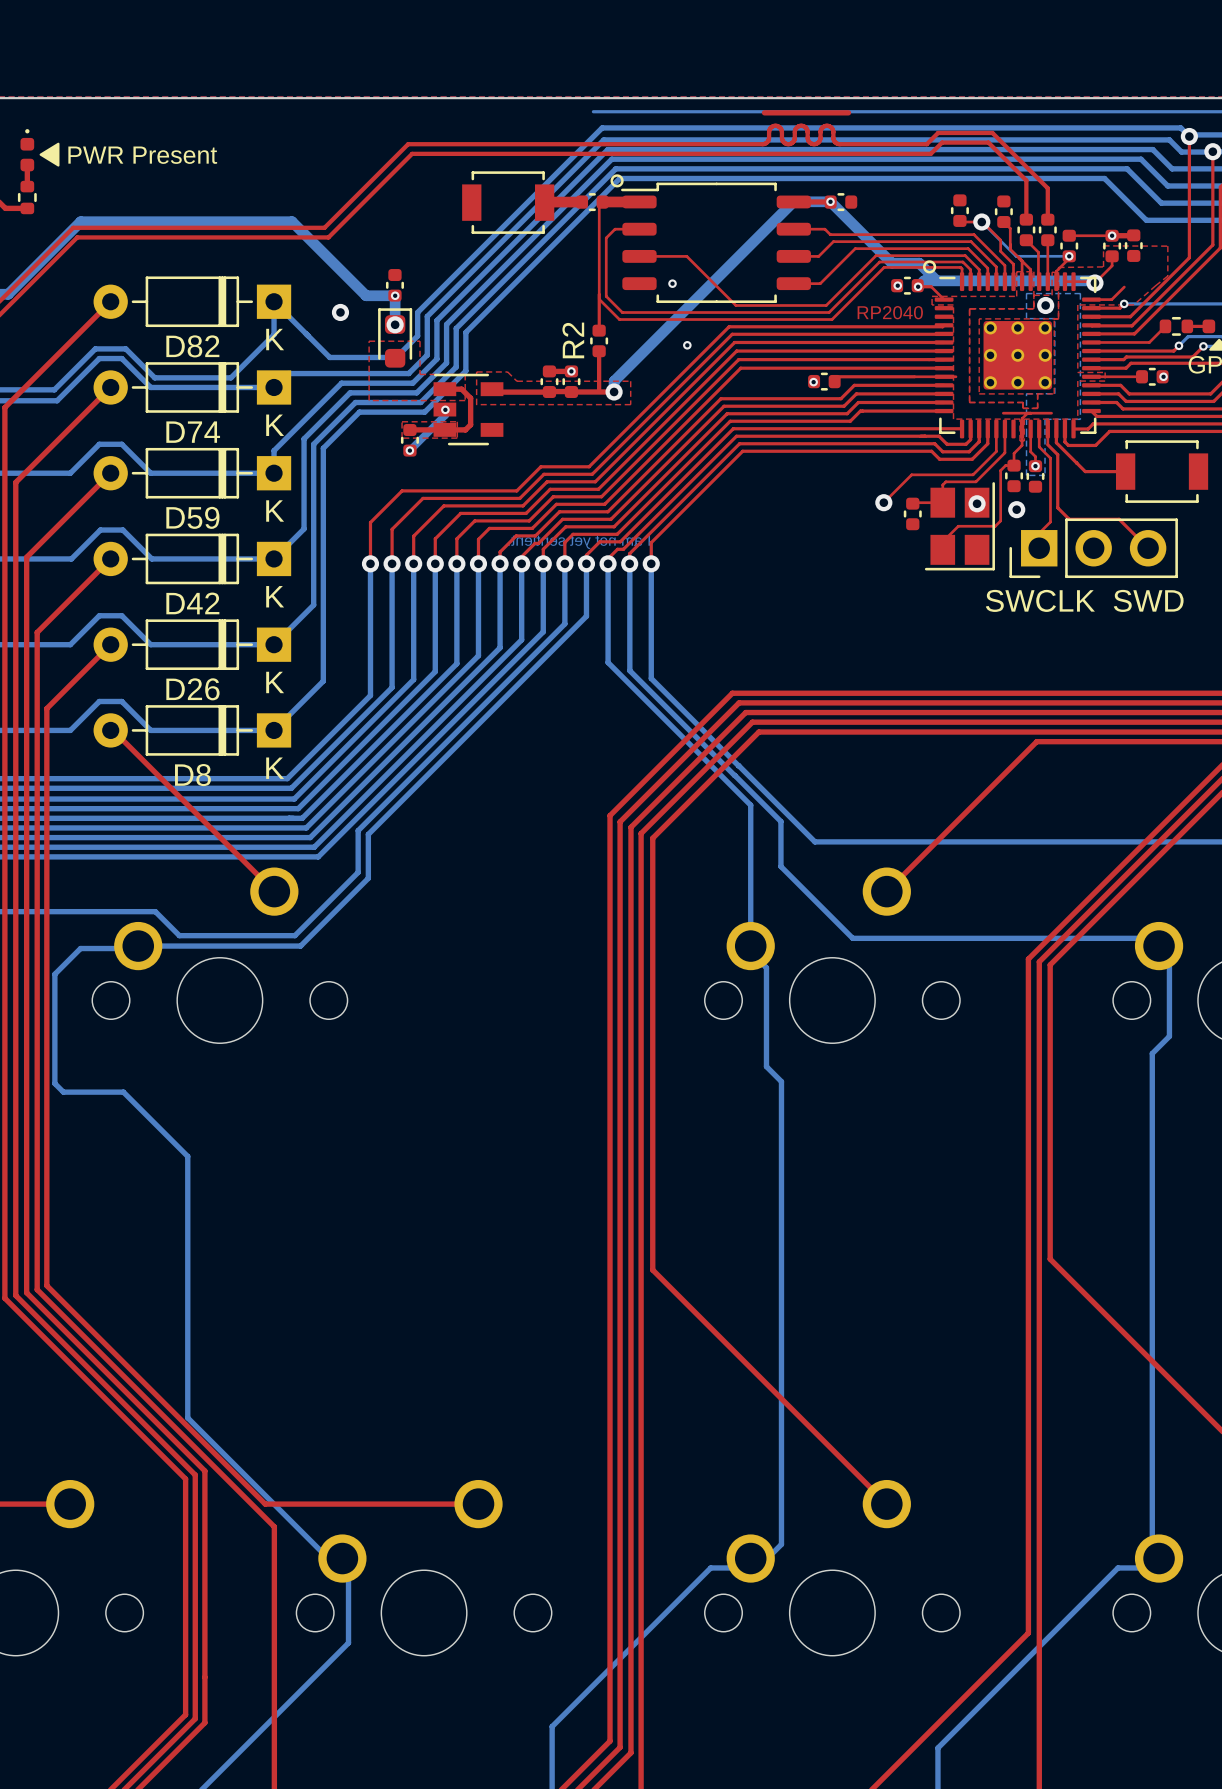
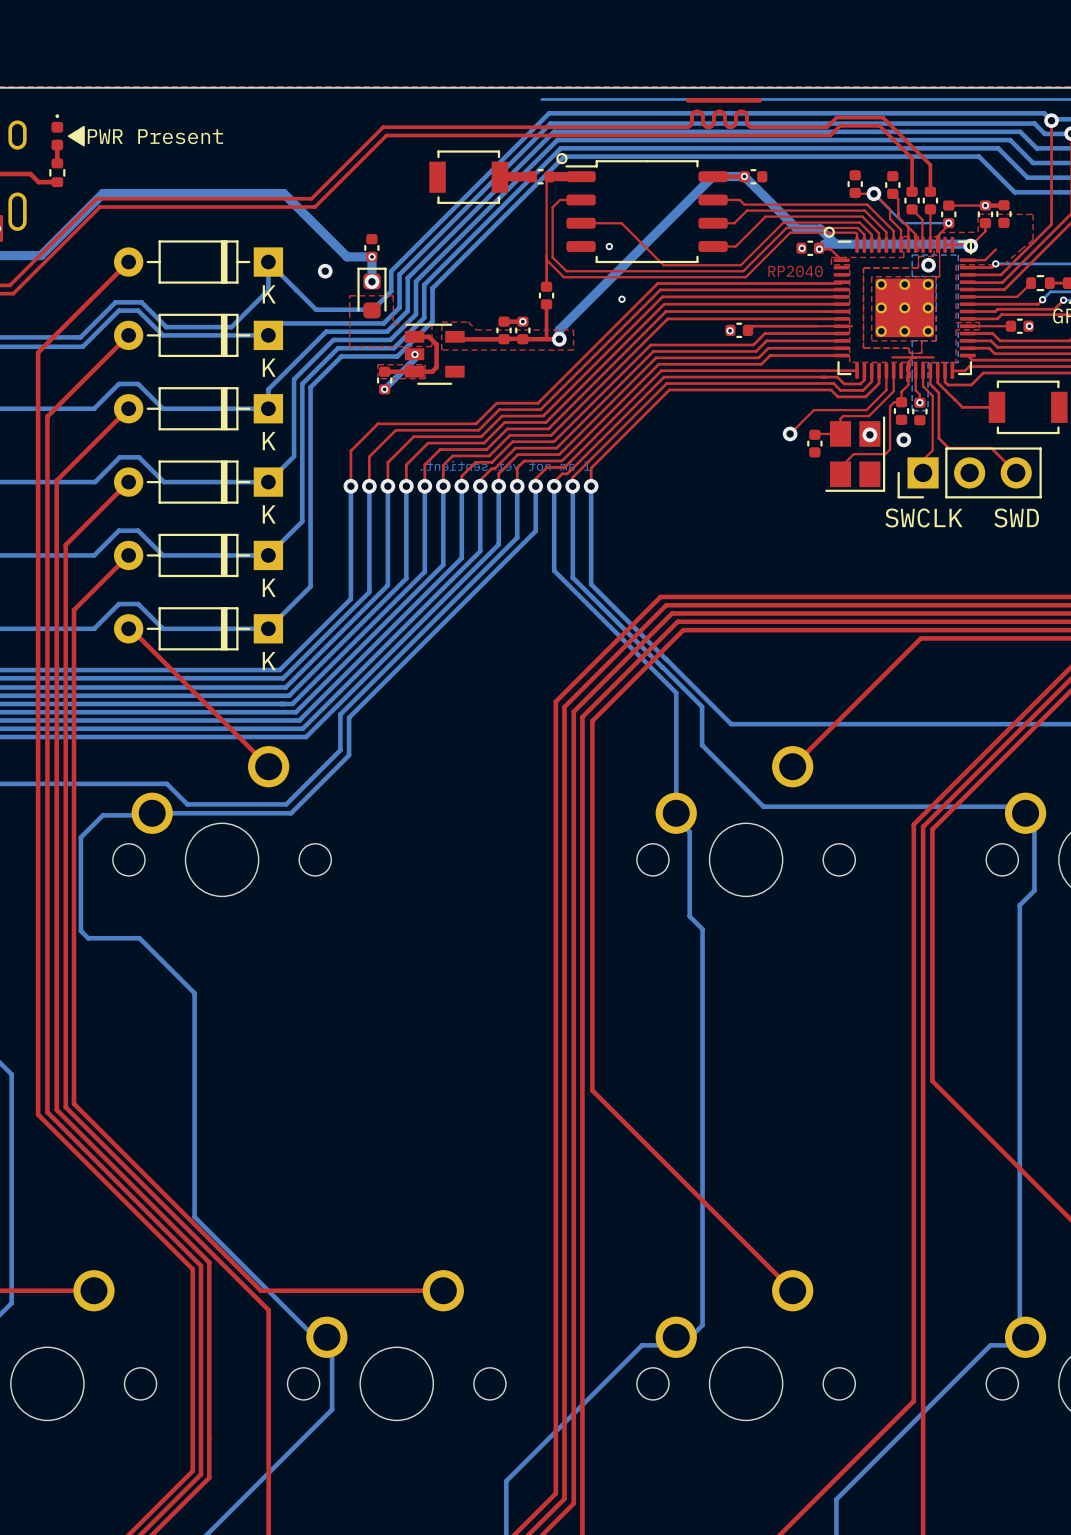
R2 name: R2 (573, 340) -> none
D82 name: D82 (192, 346) -> none
D74 name: D74 (193, 432) -> none
D59 name: D59 (192, 517) -> none
D42 name: D42 (192, 603) -> none
D26 name: D26 (192, 689) -> none
D8 name: D8 (192, 775) -> none

